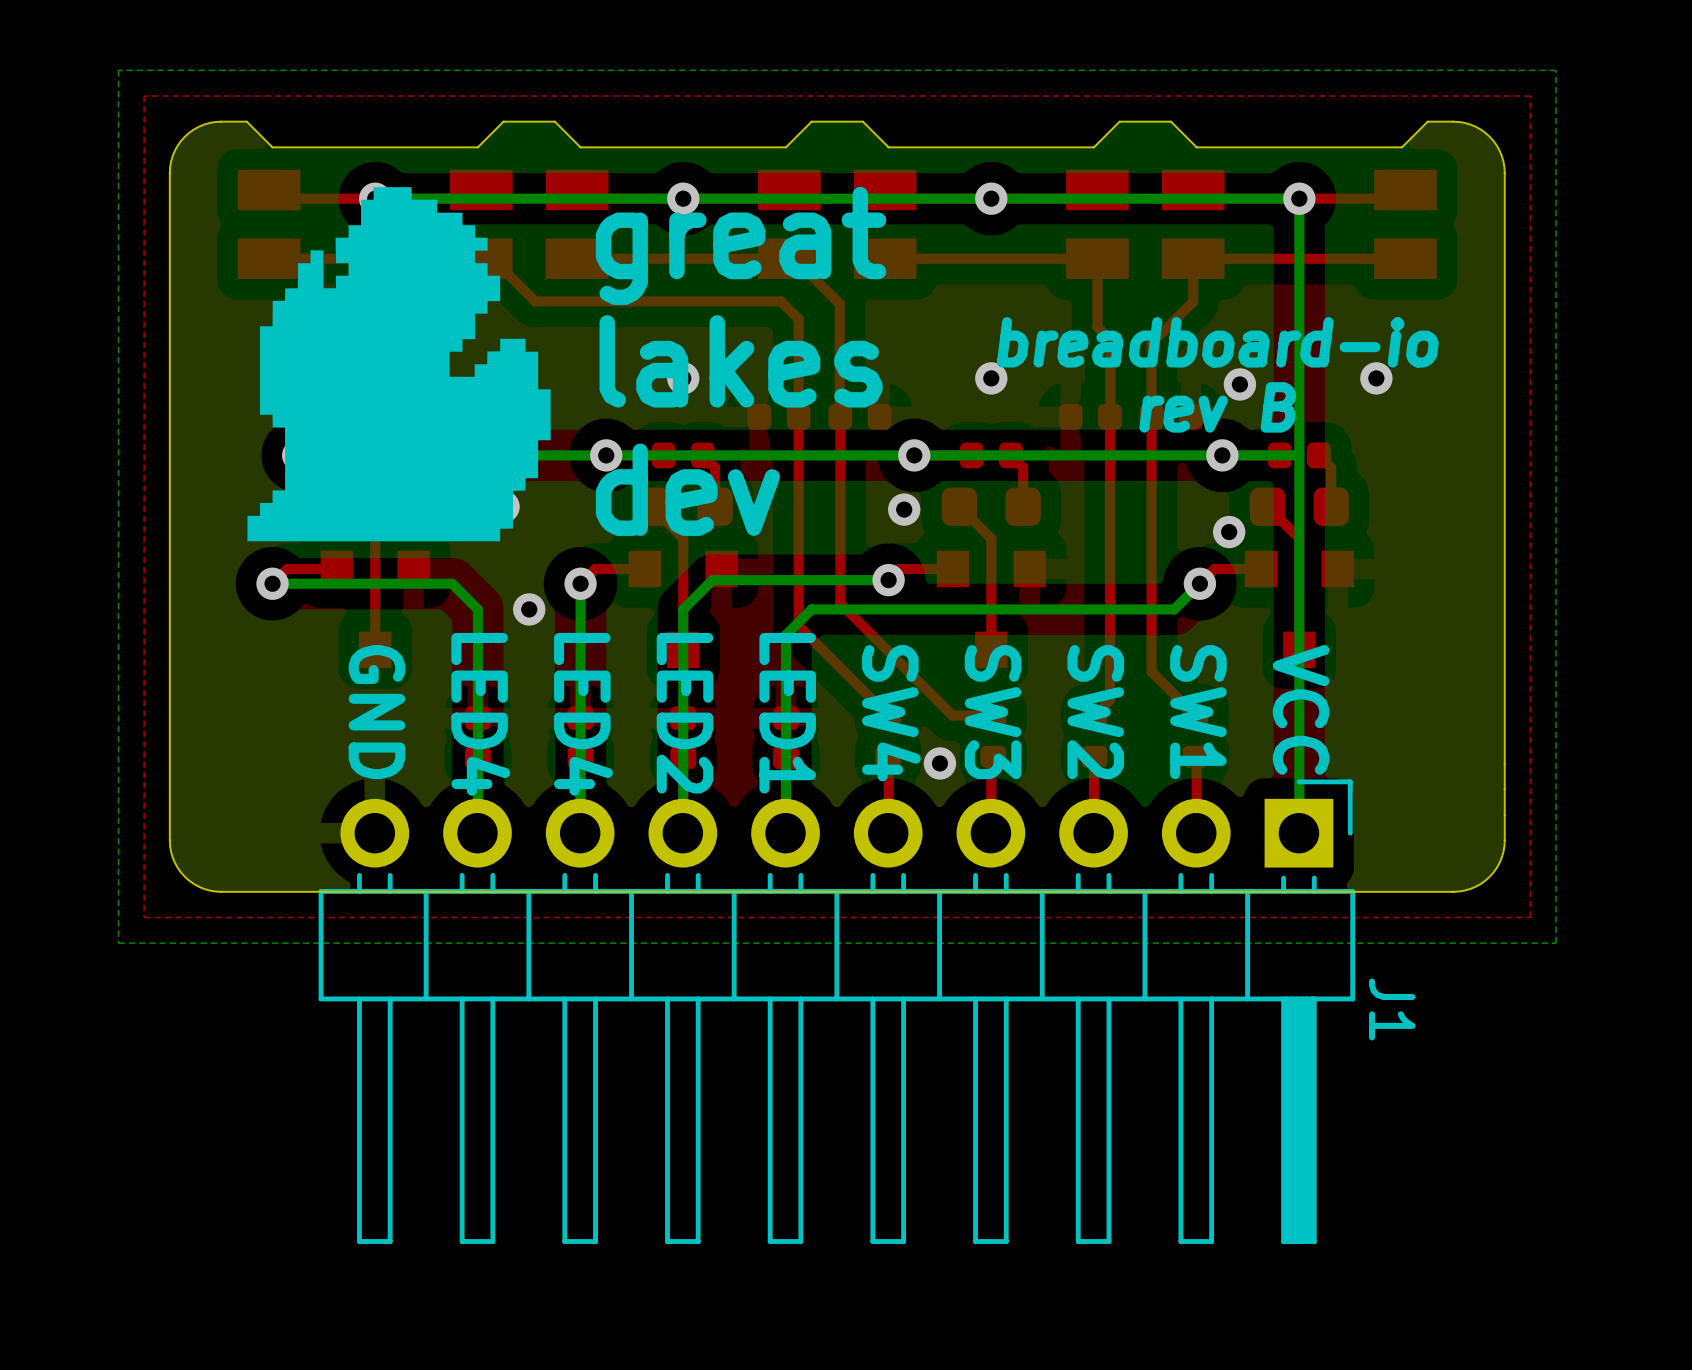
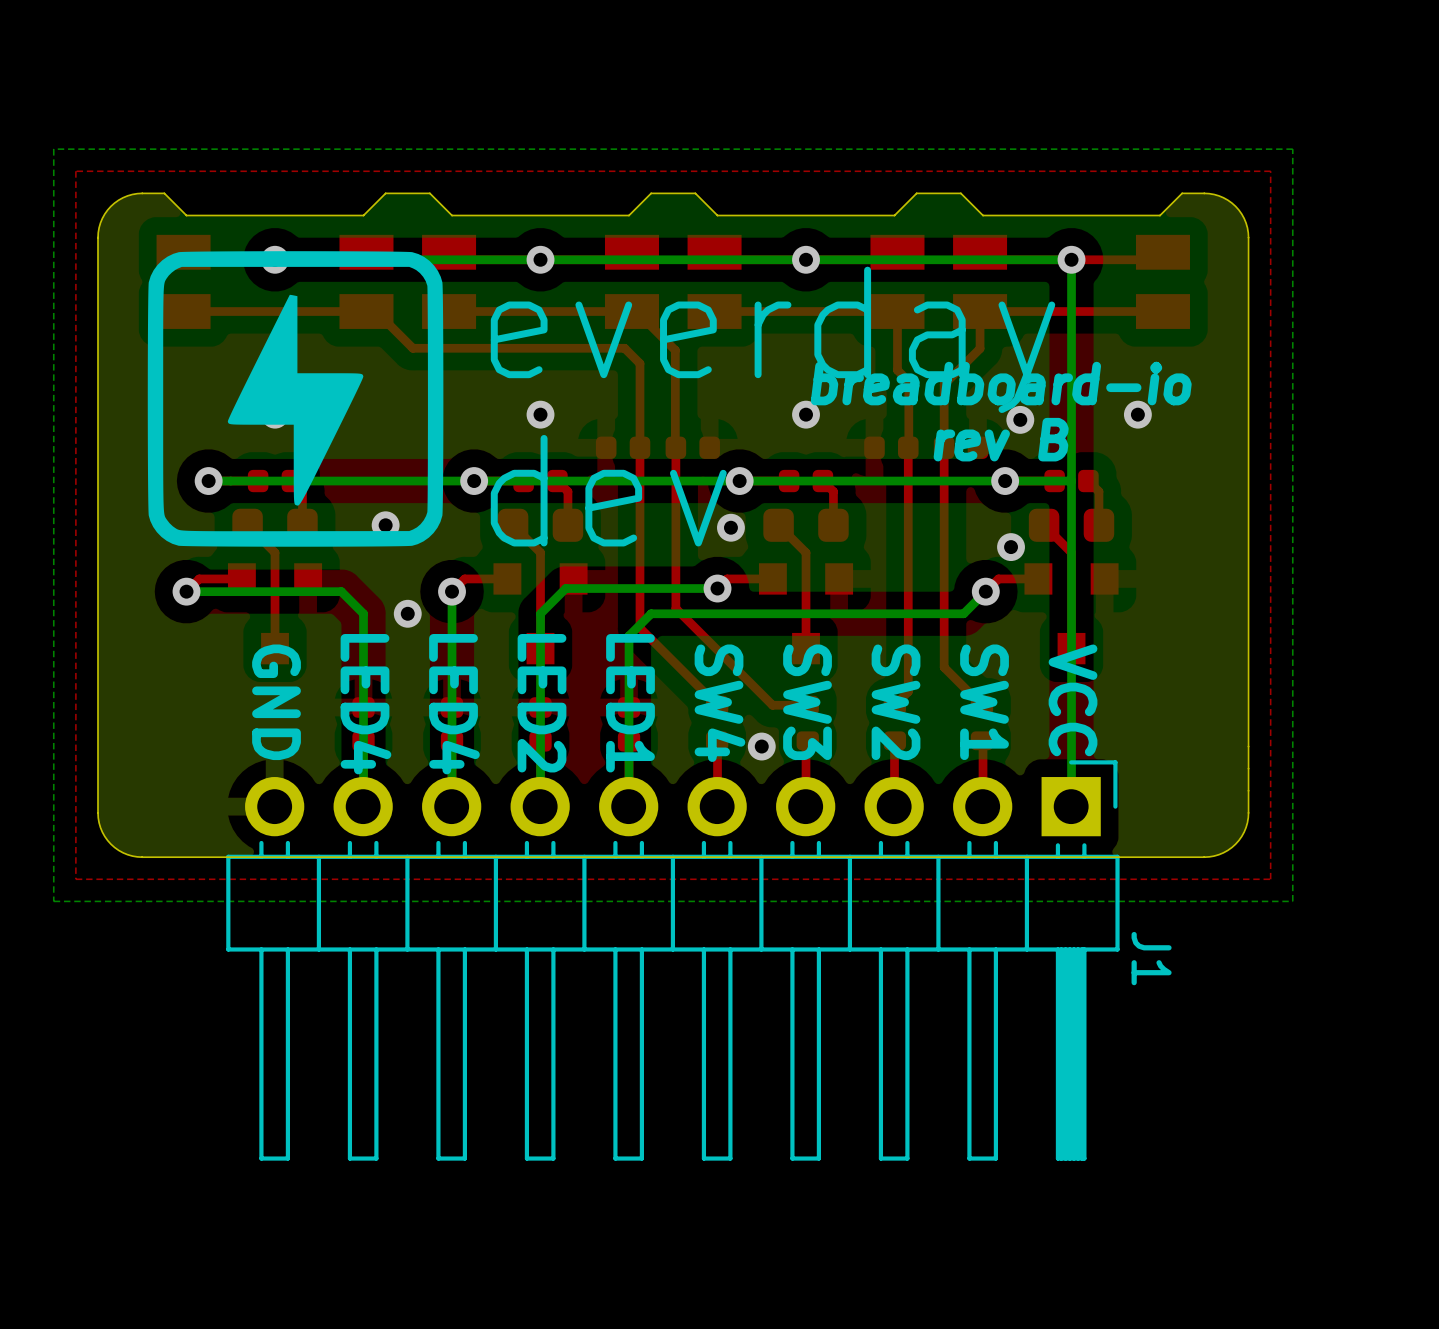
drawing shape: [247, 186, 887, 542] -> [147, 251, 444, 547]
text: none -> everday (773, 339)
text: none -> dev (608, 490)

